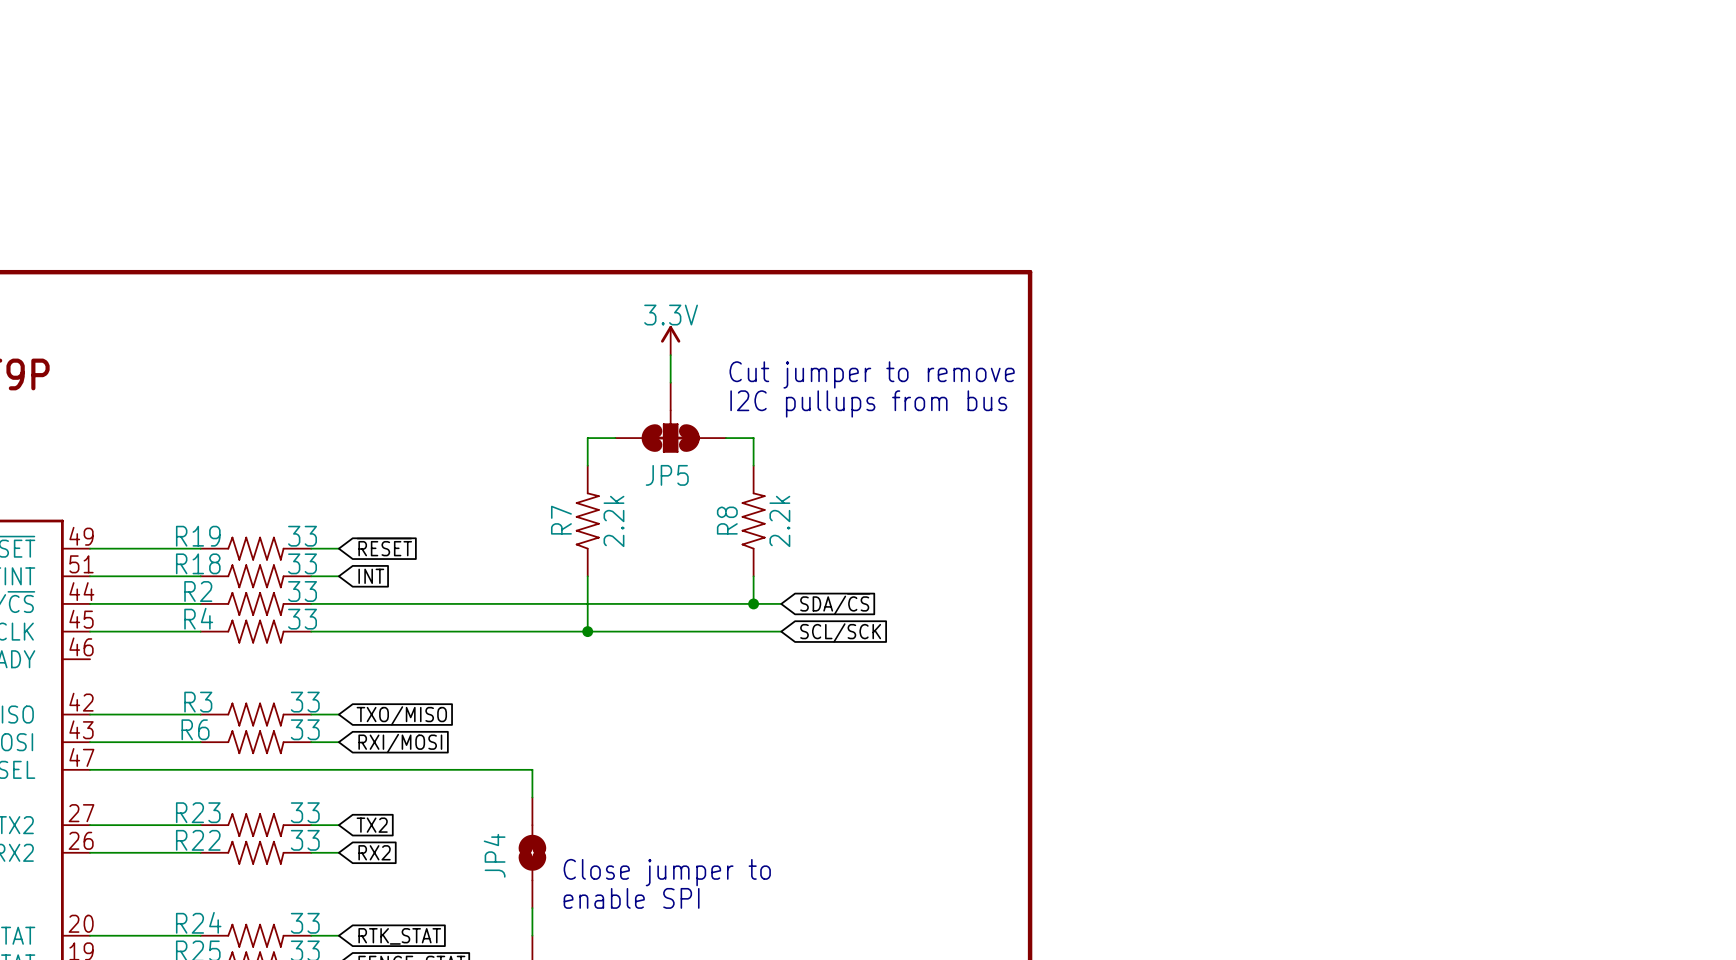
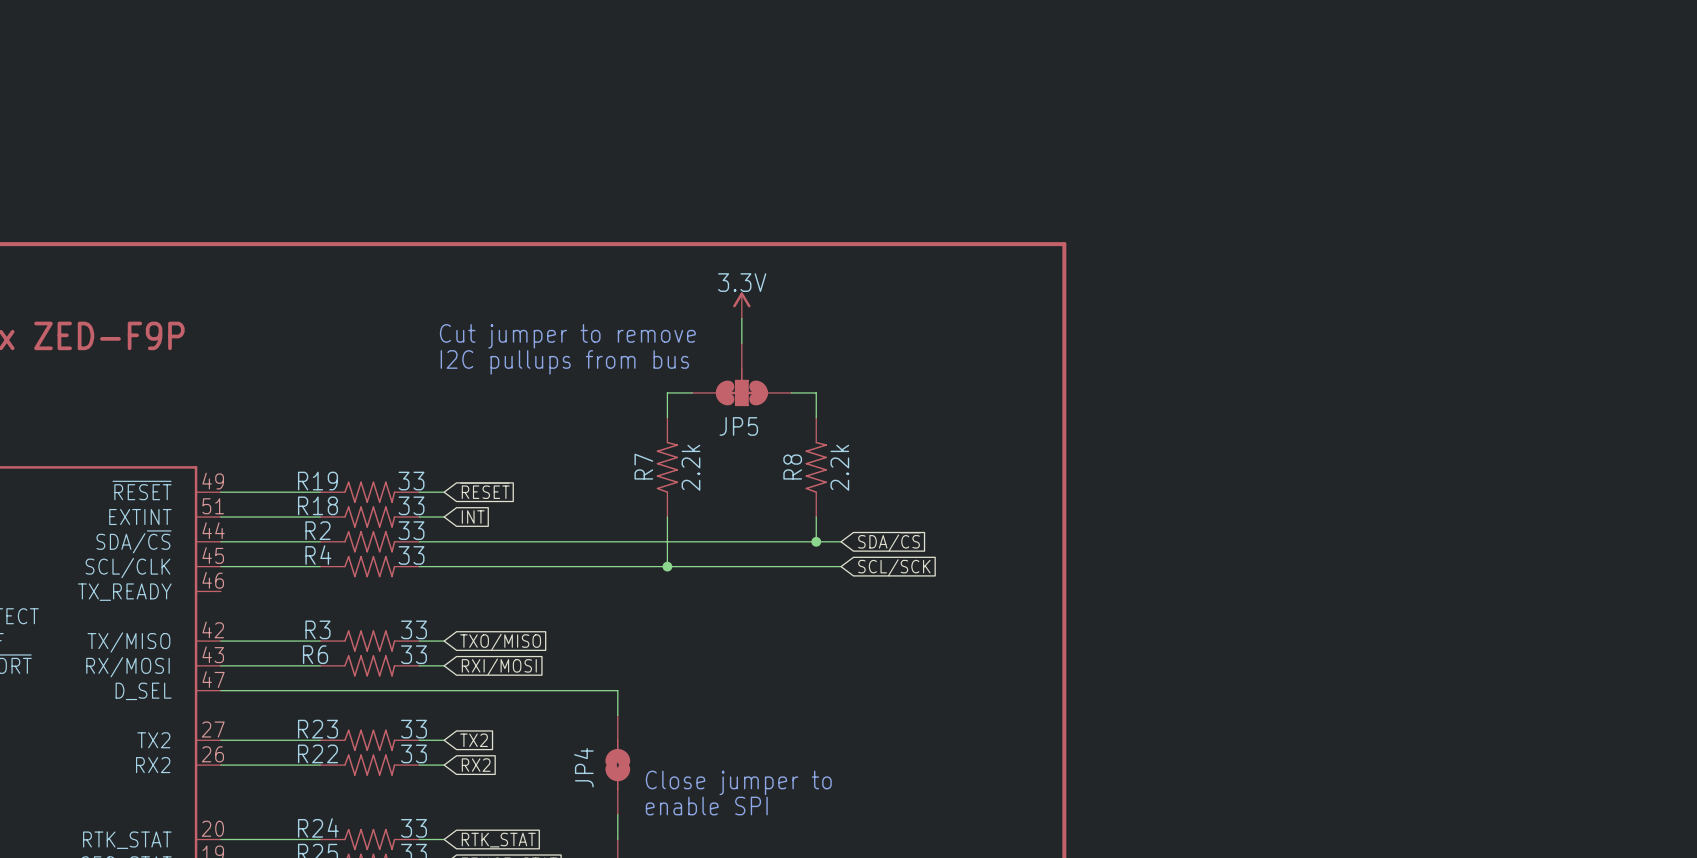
text: none -> Cut jumper to remove (567, 336)
text: Cut jumper to remove (872, 374) -> none
text: none -> I2C pullups from bus (564, 362)
text: I2C pullups from bus (868, 403) -> none

